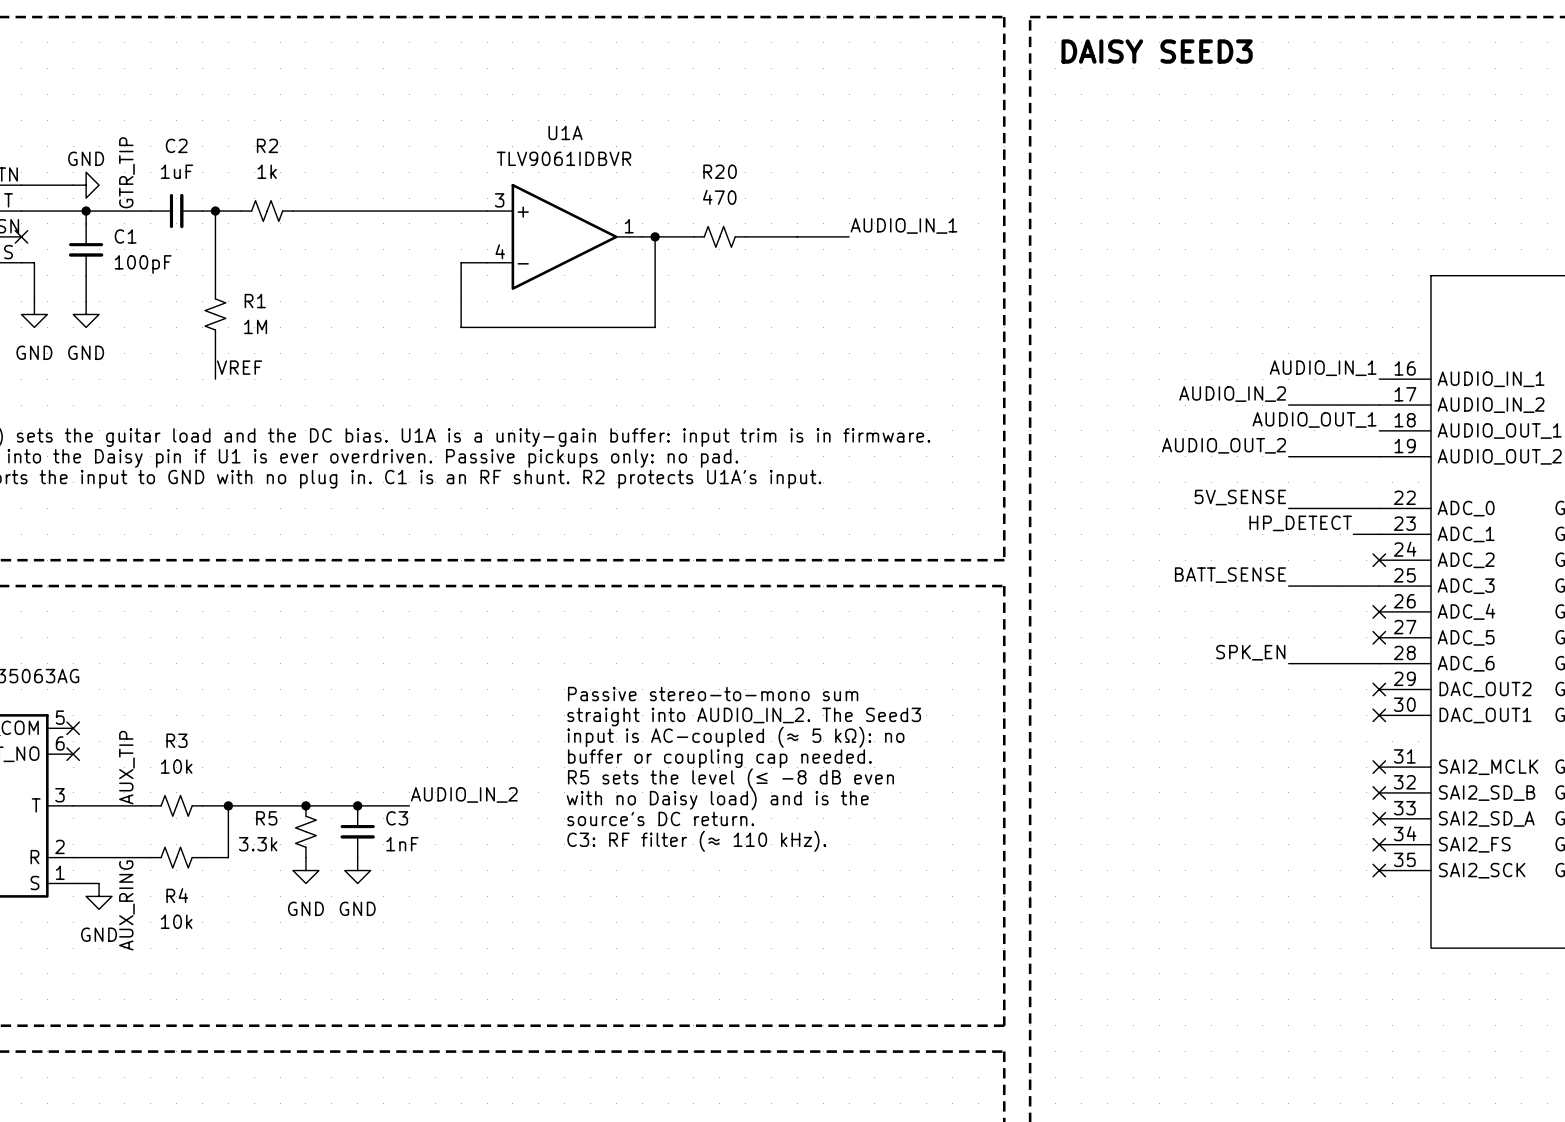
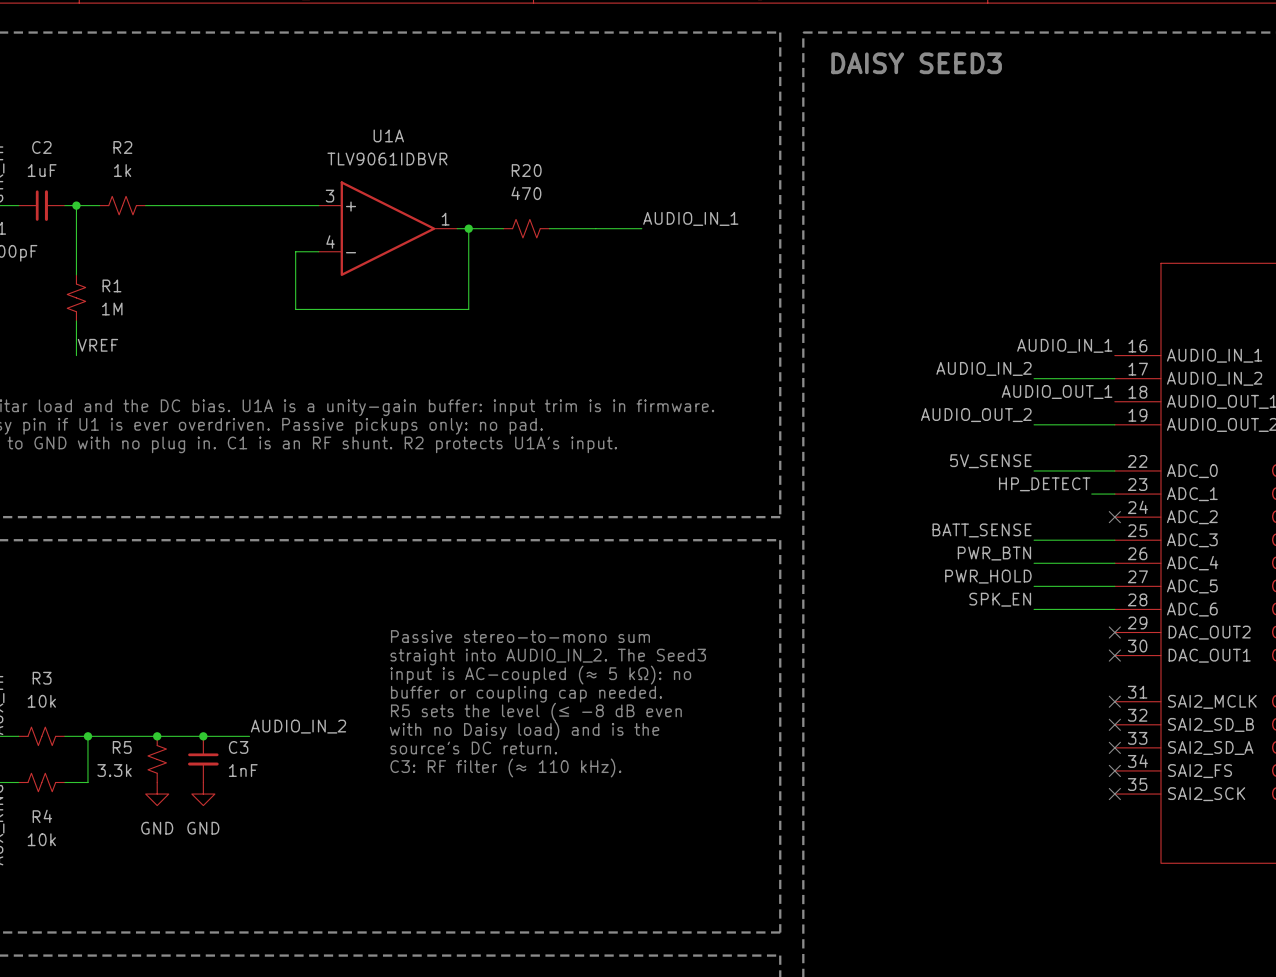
label: none -> PWR_BTN (994, 553)
wire: none -> (1034, 563) (1114, 563)
no-connect mark: (1379, 611) -> none
label: none -> PWR_HOLD (988, 576)
wire: none -> (1034, 586) (1114, 586)
no-connect mark: (1379, 637) -> none

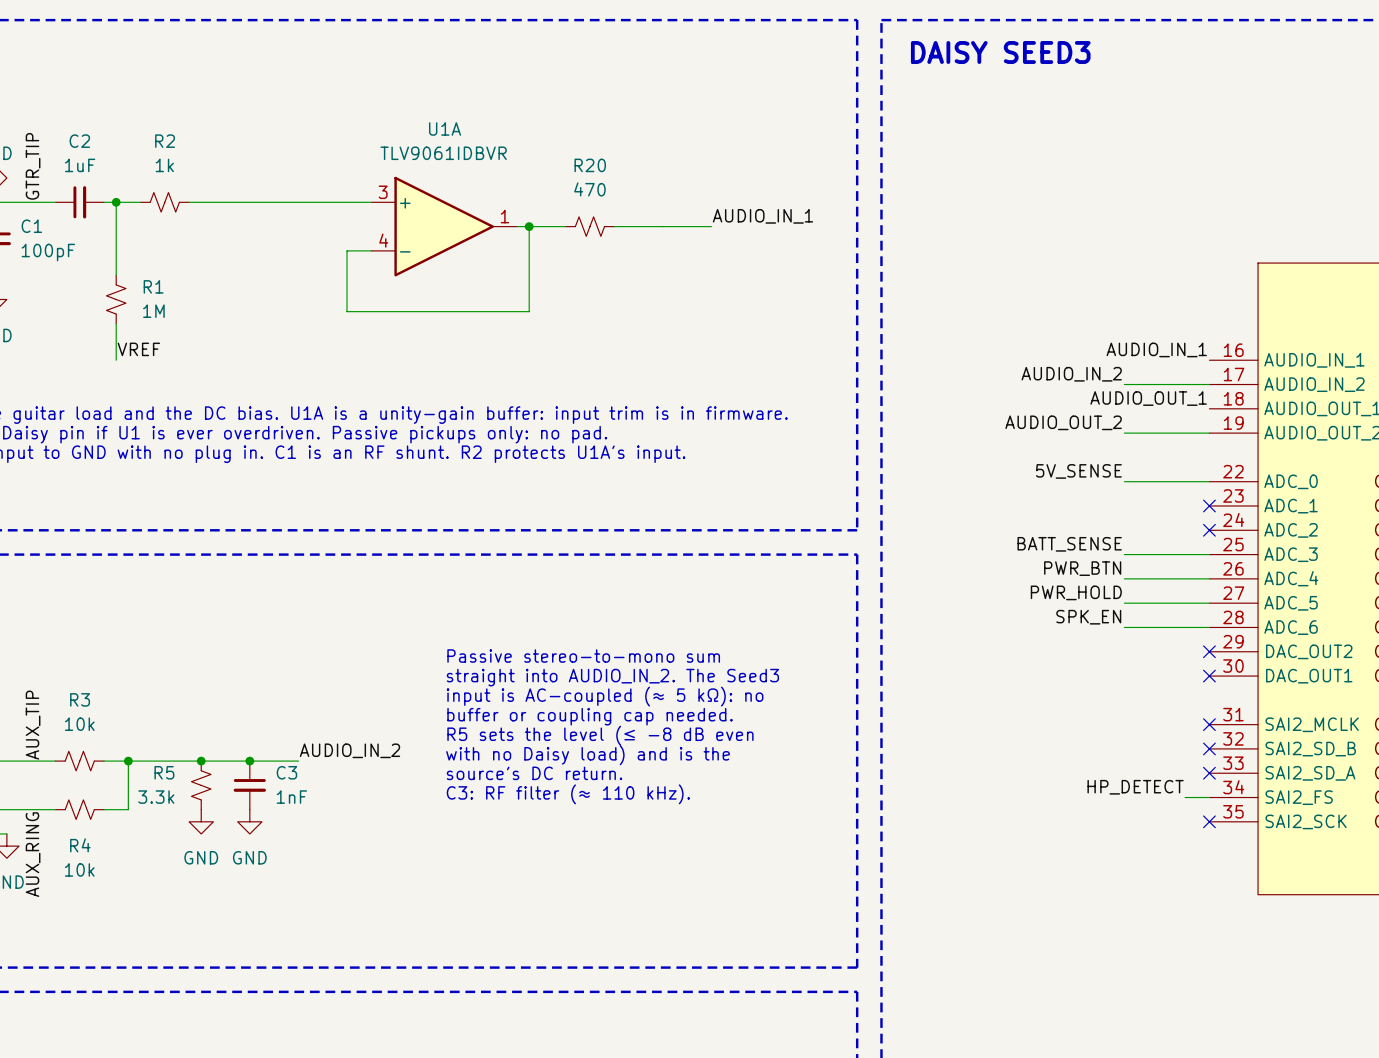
label: HP_DETECT (1044, 484) -> none
wire: (1091, 494) (1114, 494) -> none
no-connect mark: none -> (1209, 505)
label: none -> HP_DETECT (1135, 787)
wire: none -> (1185, 797) (1209, 797)
no-connect mark: (1114, 770) -> none

